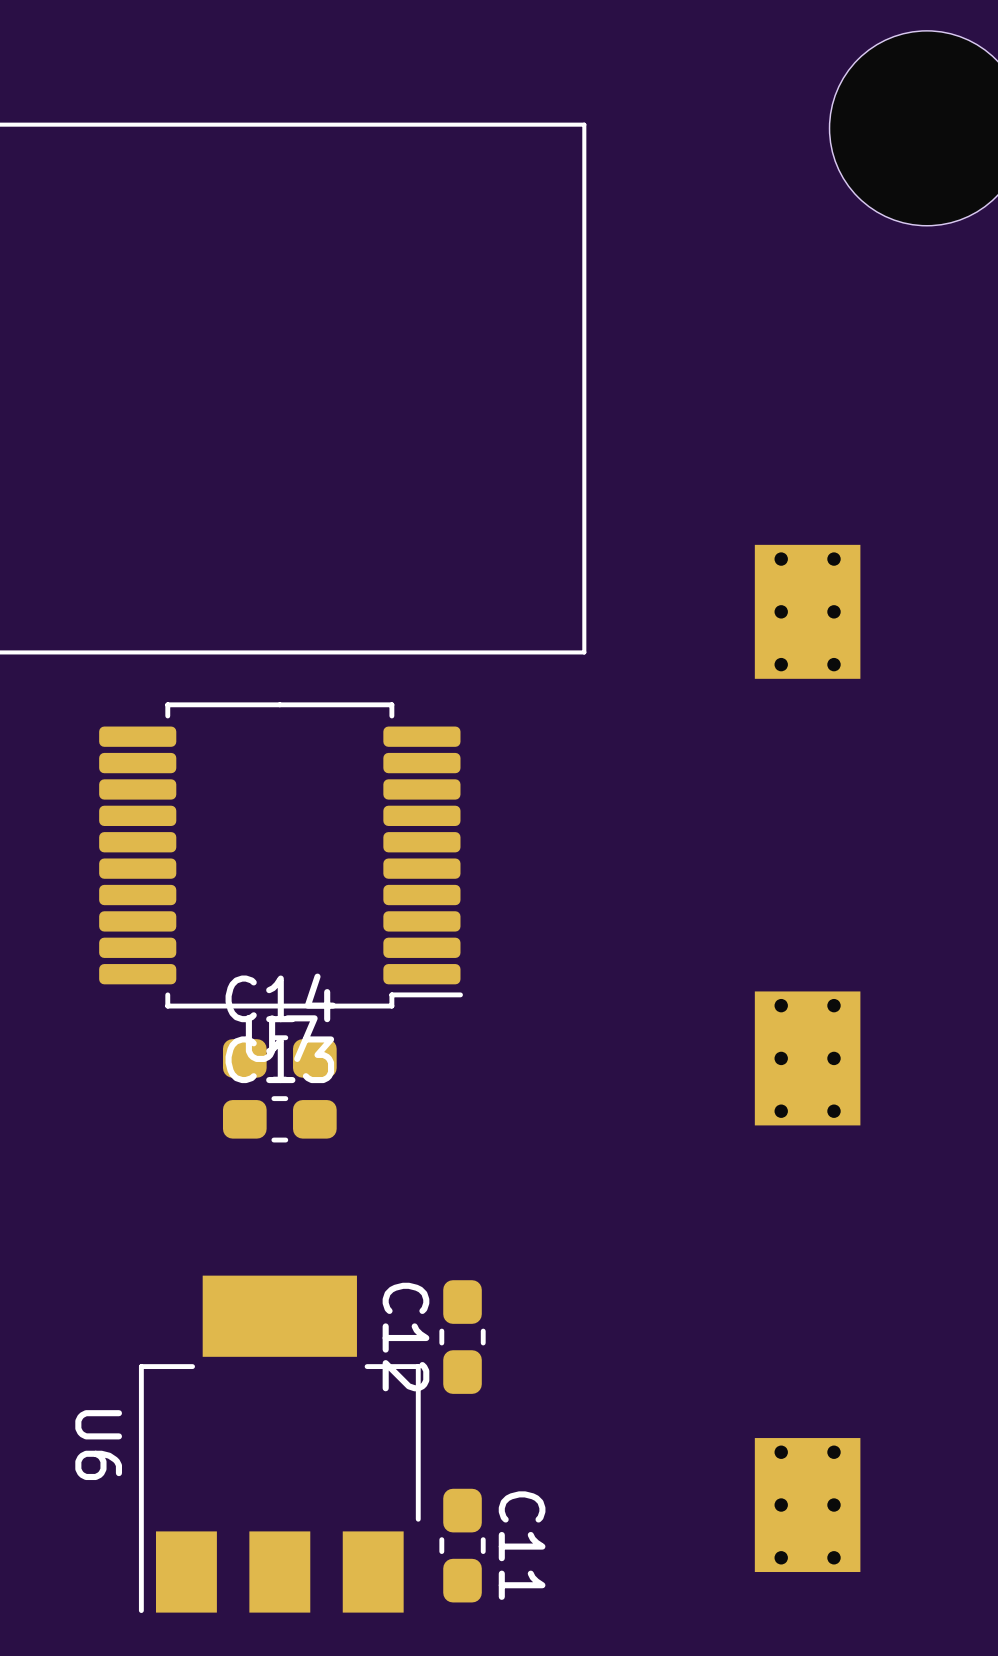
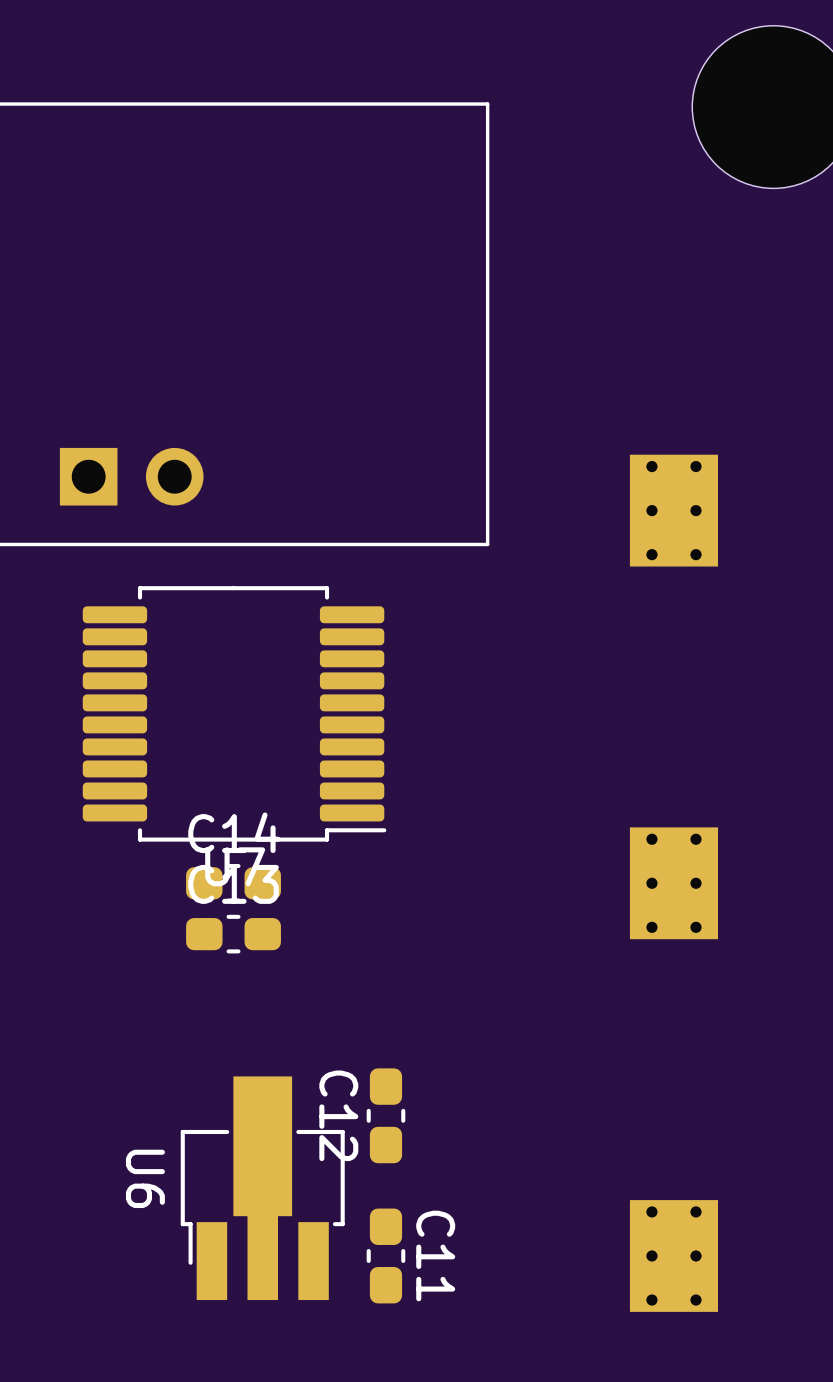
part: none -> (131, 476)
U6 footprint: [138, 1275, 421, 1614] -> [180, 1076, 345, 1301]
C11 position: (462, 1545) -> (385, 1255)

